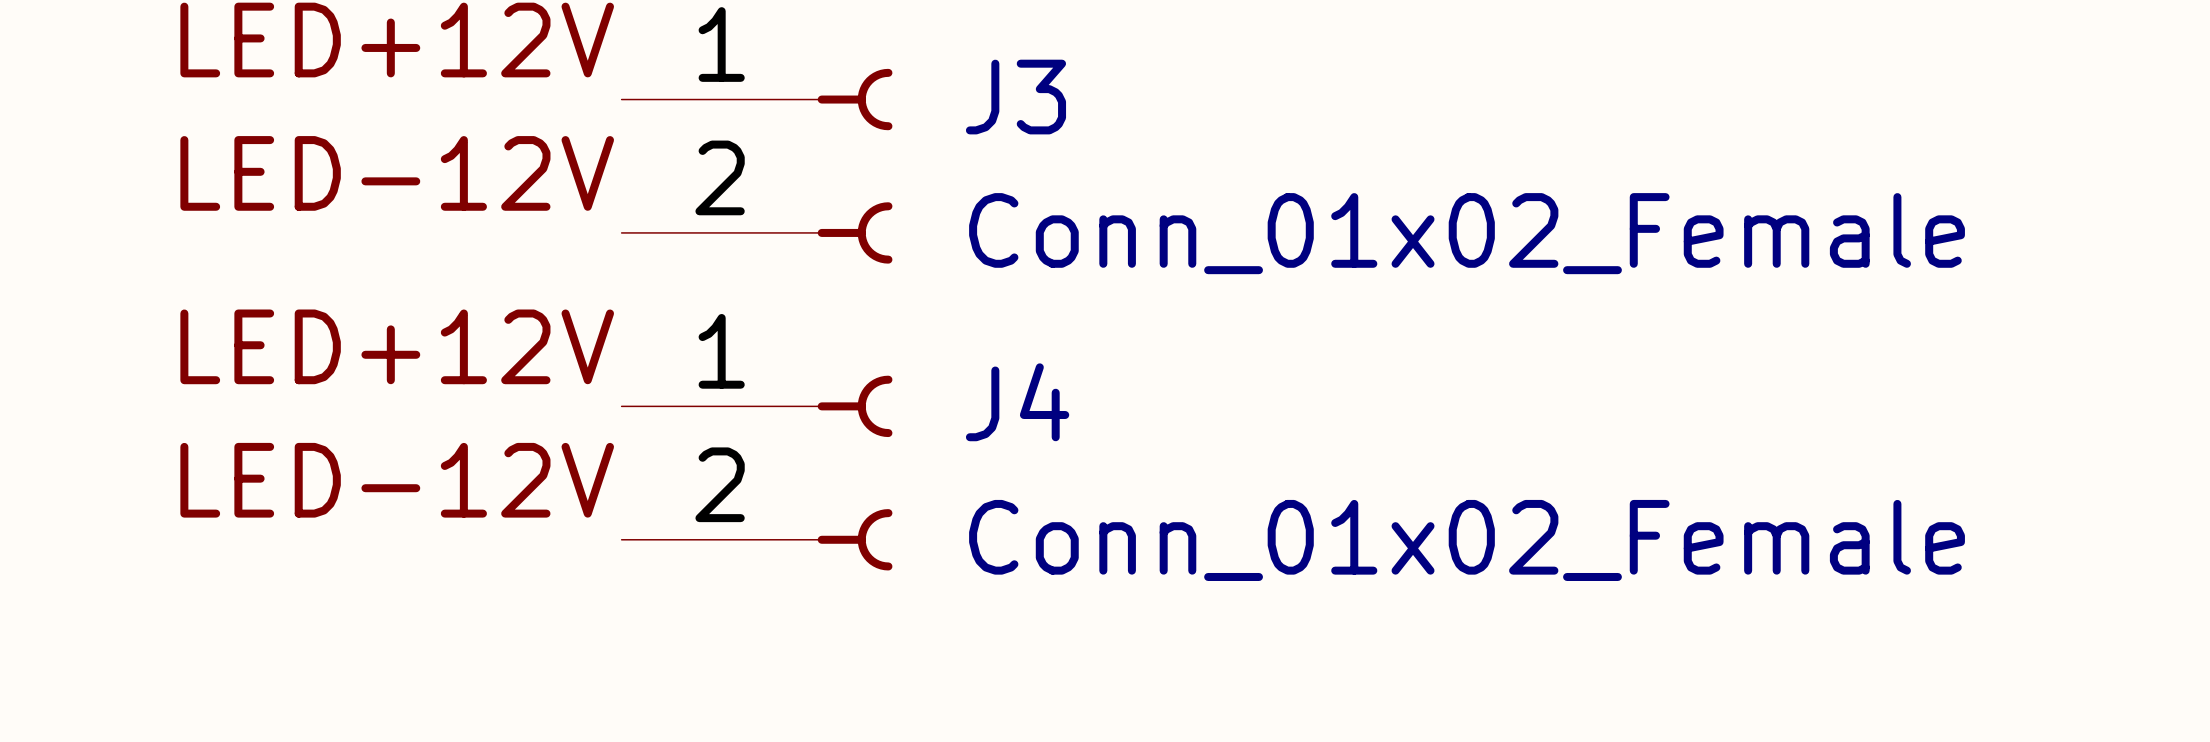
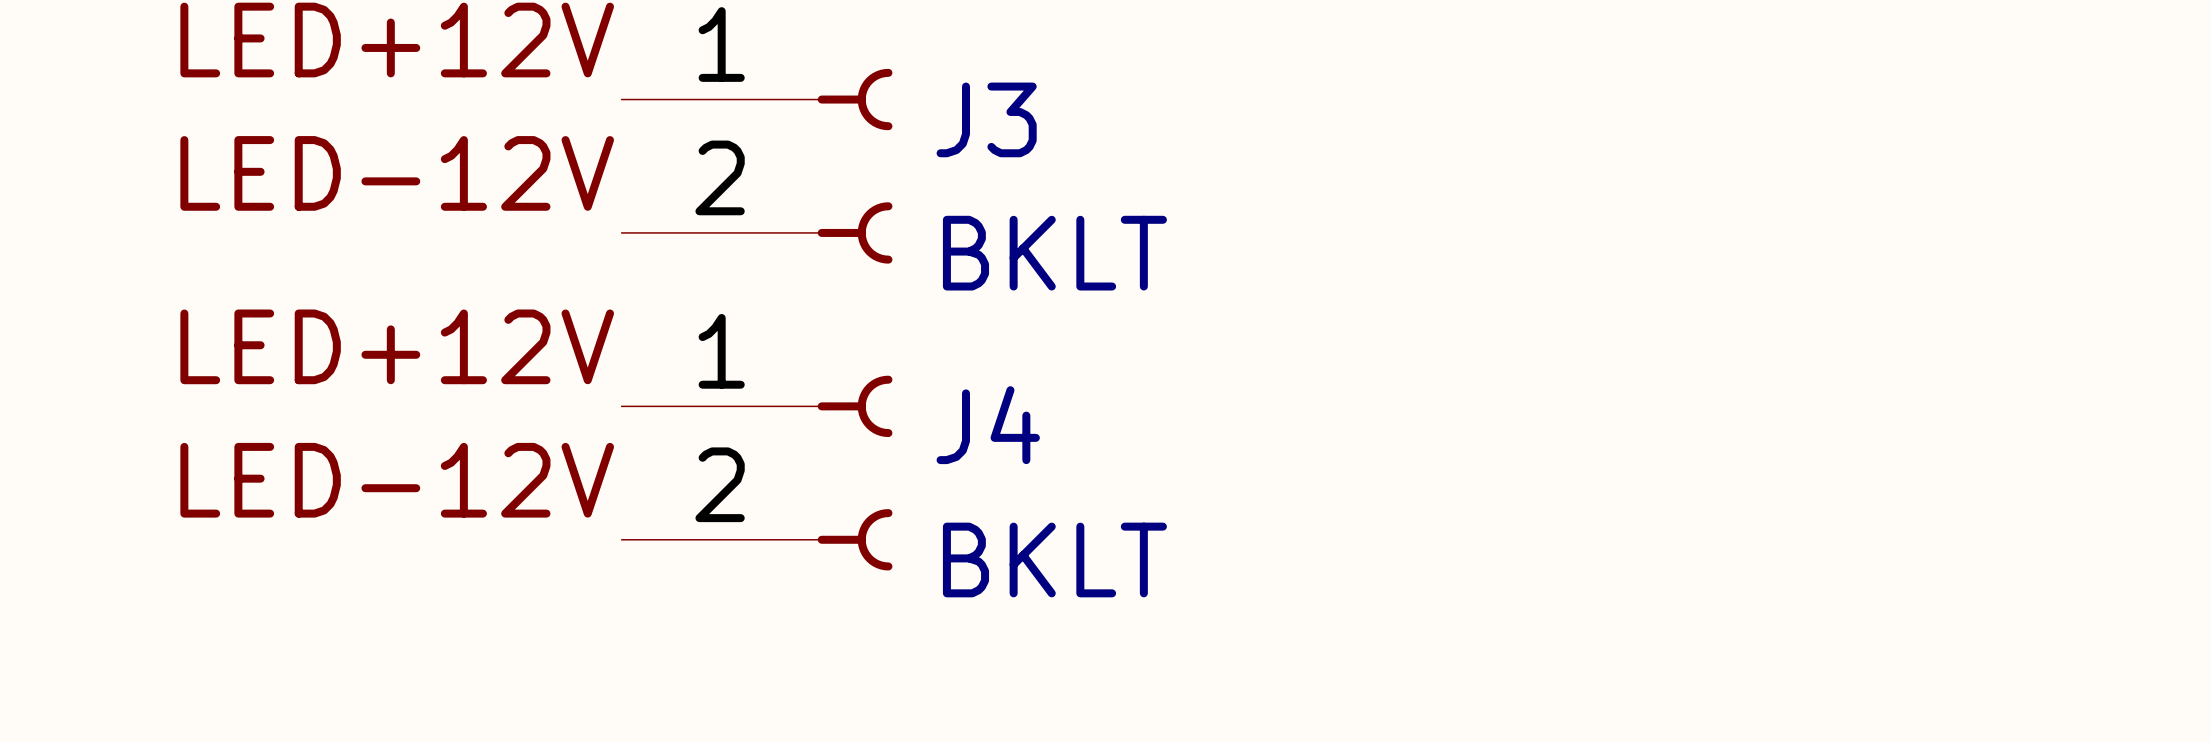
J3 name position: J3 (1015, 97) -> J3 (986, 119)
J3 value: Conn_01x02_Female (1467, 233) -> BKLT (1054, 253)
J4 name position: J4 (1017, 402) -> J4 (988, 425)
J4 value: Conn_01x02_Female (1467, 540) -> BKLT (1054, 559)

